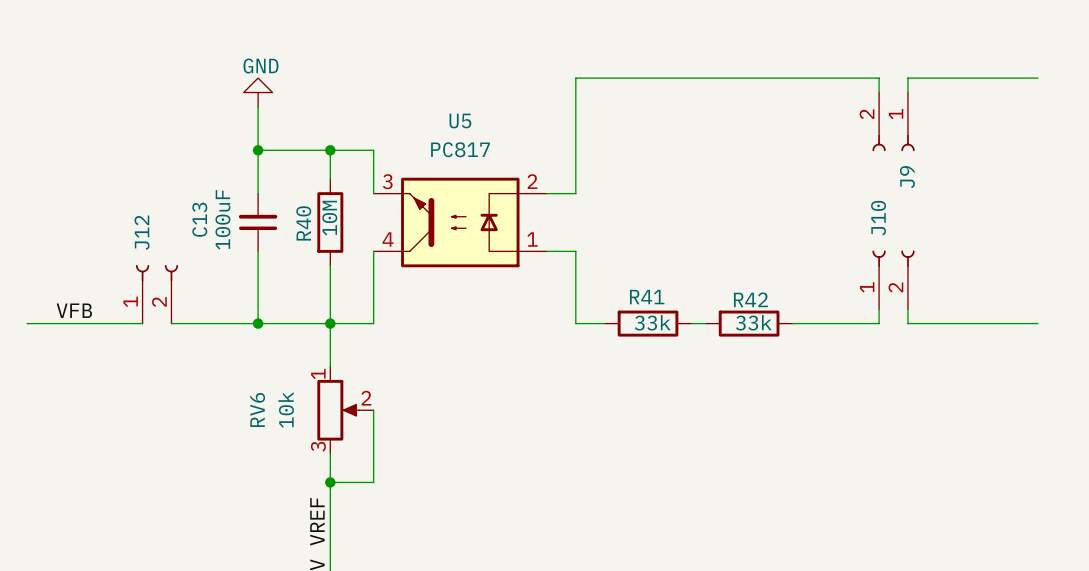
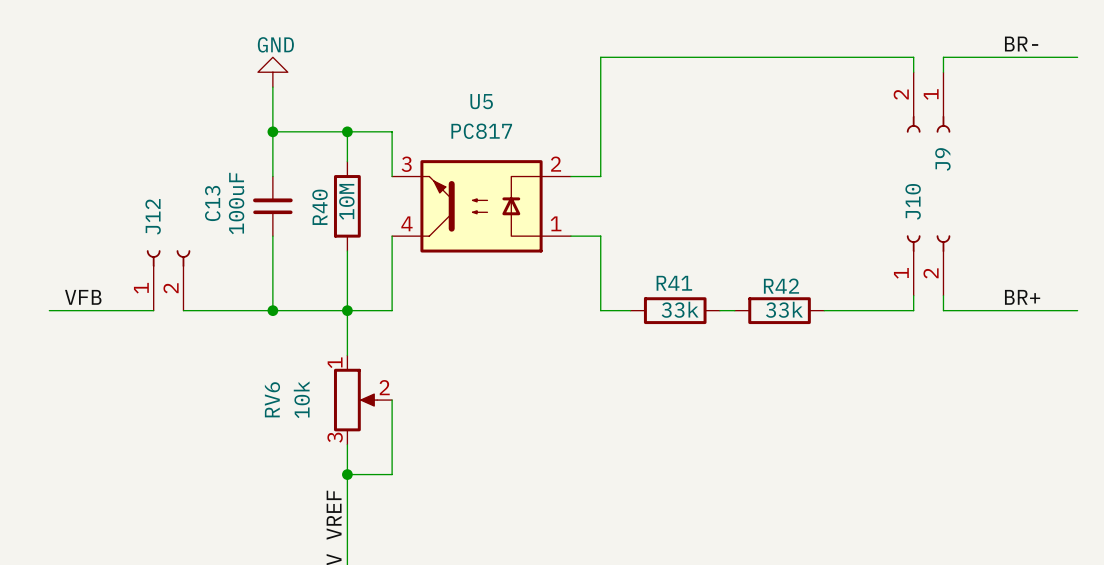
label: none -> BR- (1021, 44)
label: none -> BR+ (1022, 297)
wire: (27, 323) (41, 323) -> none

